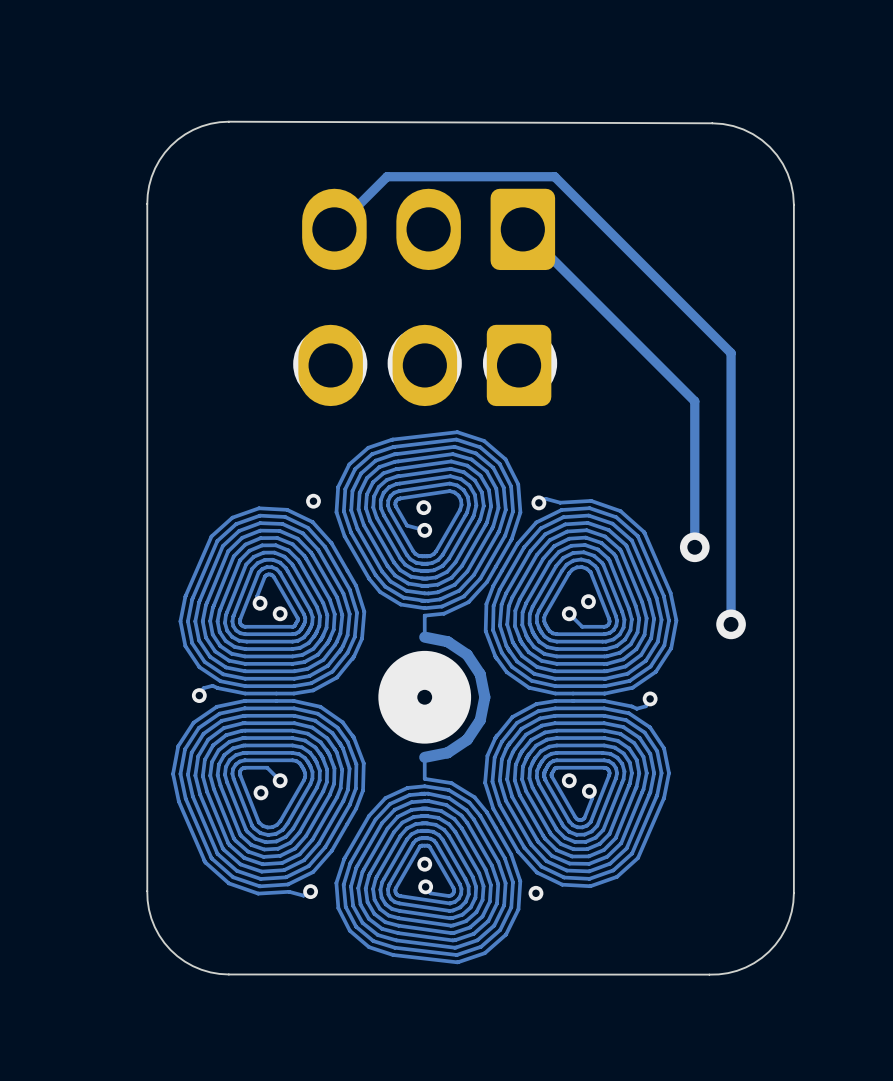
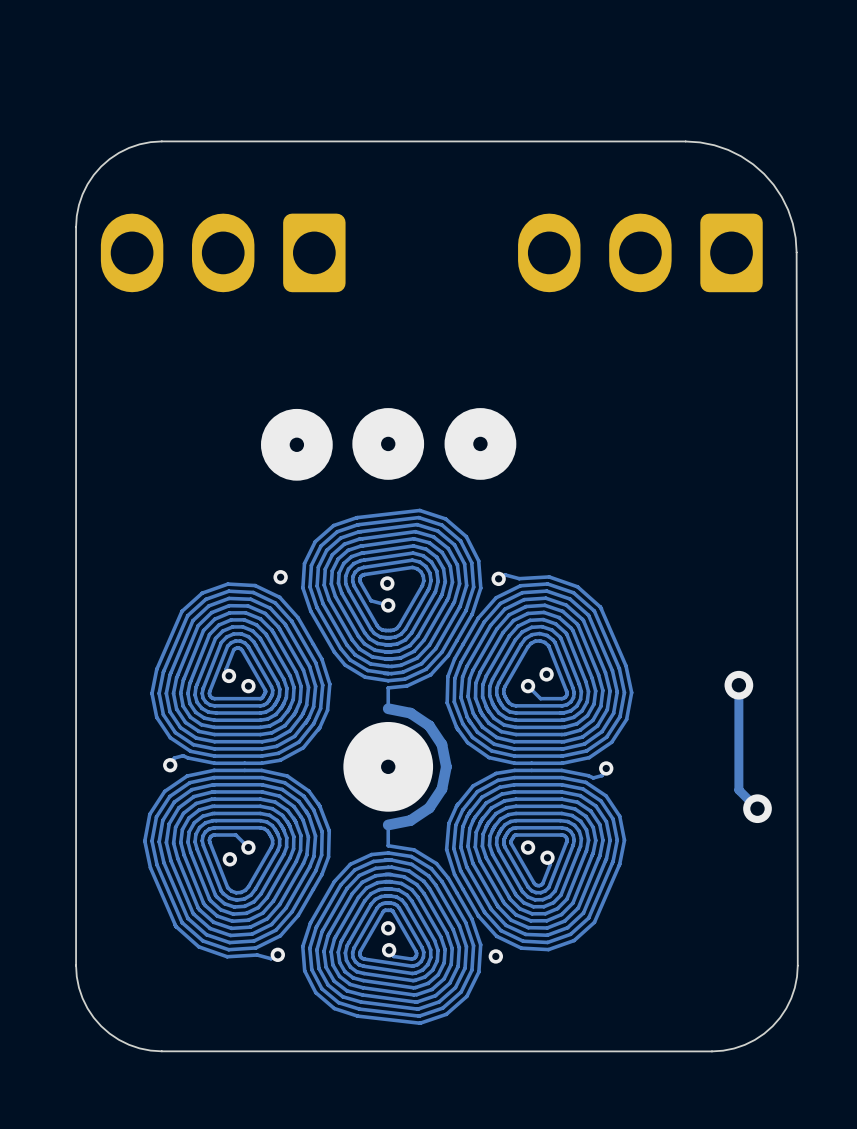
board edge: (228, 121) (722, 124) (753, 134) (769, 147) (782, 163) (791, 183) (793, 204) (793, 893) (791, 911) (780, 937) (768, 951) (754, 963) (737, 970) (718, 974) (228, 974) (201, 969) (184, 961) (170, 949) (159, 935) (151, 918) (147, 891) (147, 194) (151, 176) (159, 160) (177, 139) (201, 126) (228, 121) -> (685, 141) (700, 142) (728, 149) (753, 164) (773, 184) (781, 196) (788, 209) (795, 237) (797, 965) (794, 987) (786, 1008) (772, 1026) (754, 1039) (734, 1048) (711, 1051) (161, 1051) (139, 1048) (118, 1039) (101, 1026) (87, 1008) (78, 987) (76, 965) (76, 227) (78, 205) (87, 184) (101, 166) (118, 152) (150, 142) (685, 141)
part: none -> (223, 252)
part: none -> (640, 252)
track: (334, 229) (387, 176) (554, 176) (731, 353) (731, 624) -> none
part: (428, 229) -> none
track: (522, 229) (694, 401) (694, 547) -> none
part: (424, 365) -> none
via: (694, 547) -> none
track: none -> (738, 685) (738, 790) (757, 808)
via: none -> (738, 685)
via: (731, 624) -> none
via: none -> (757, 808)

